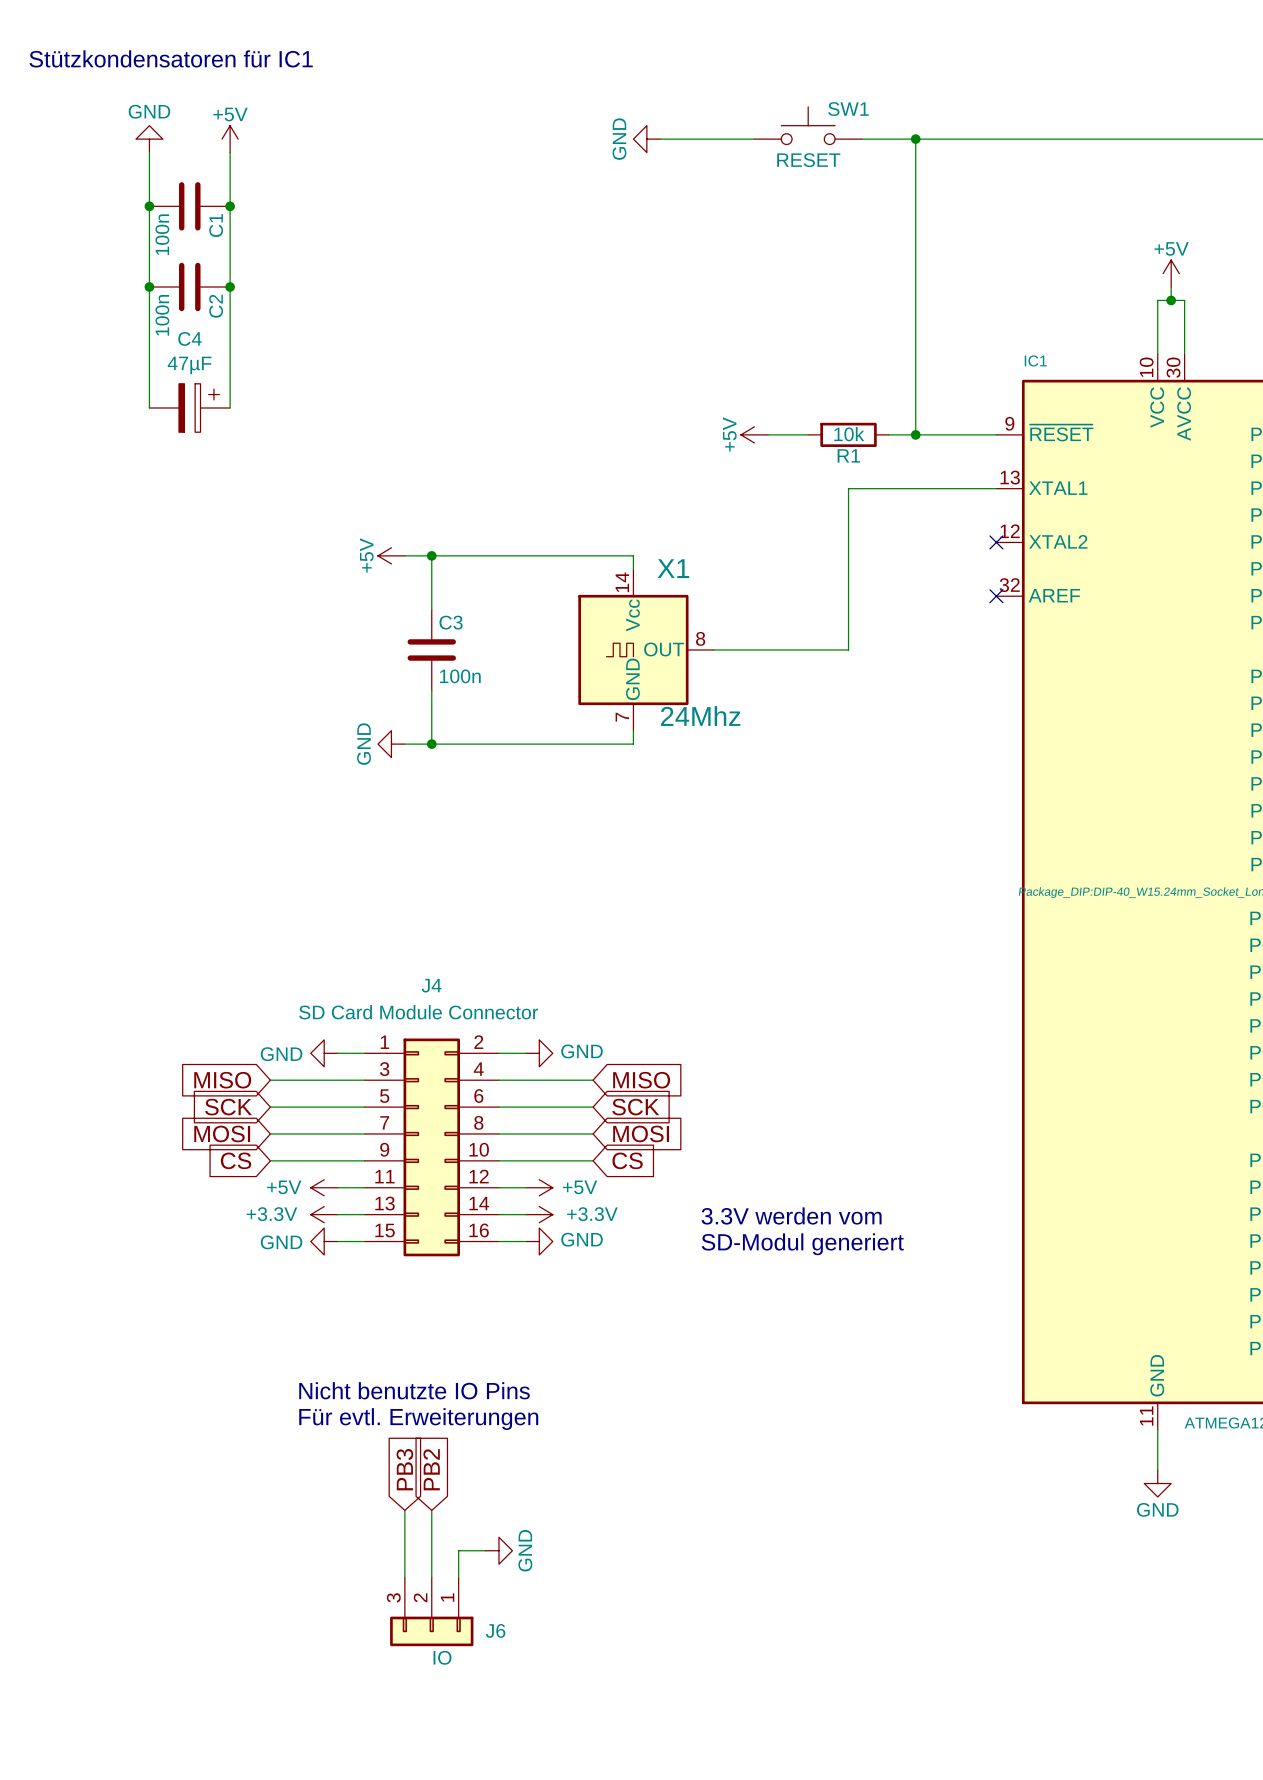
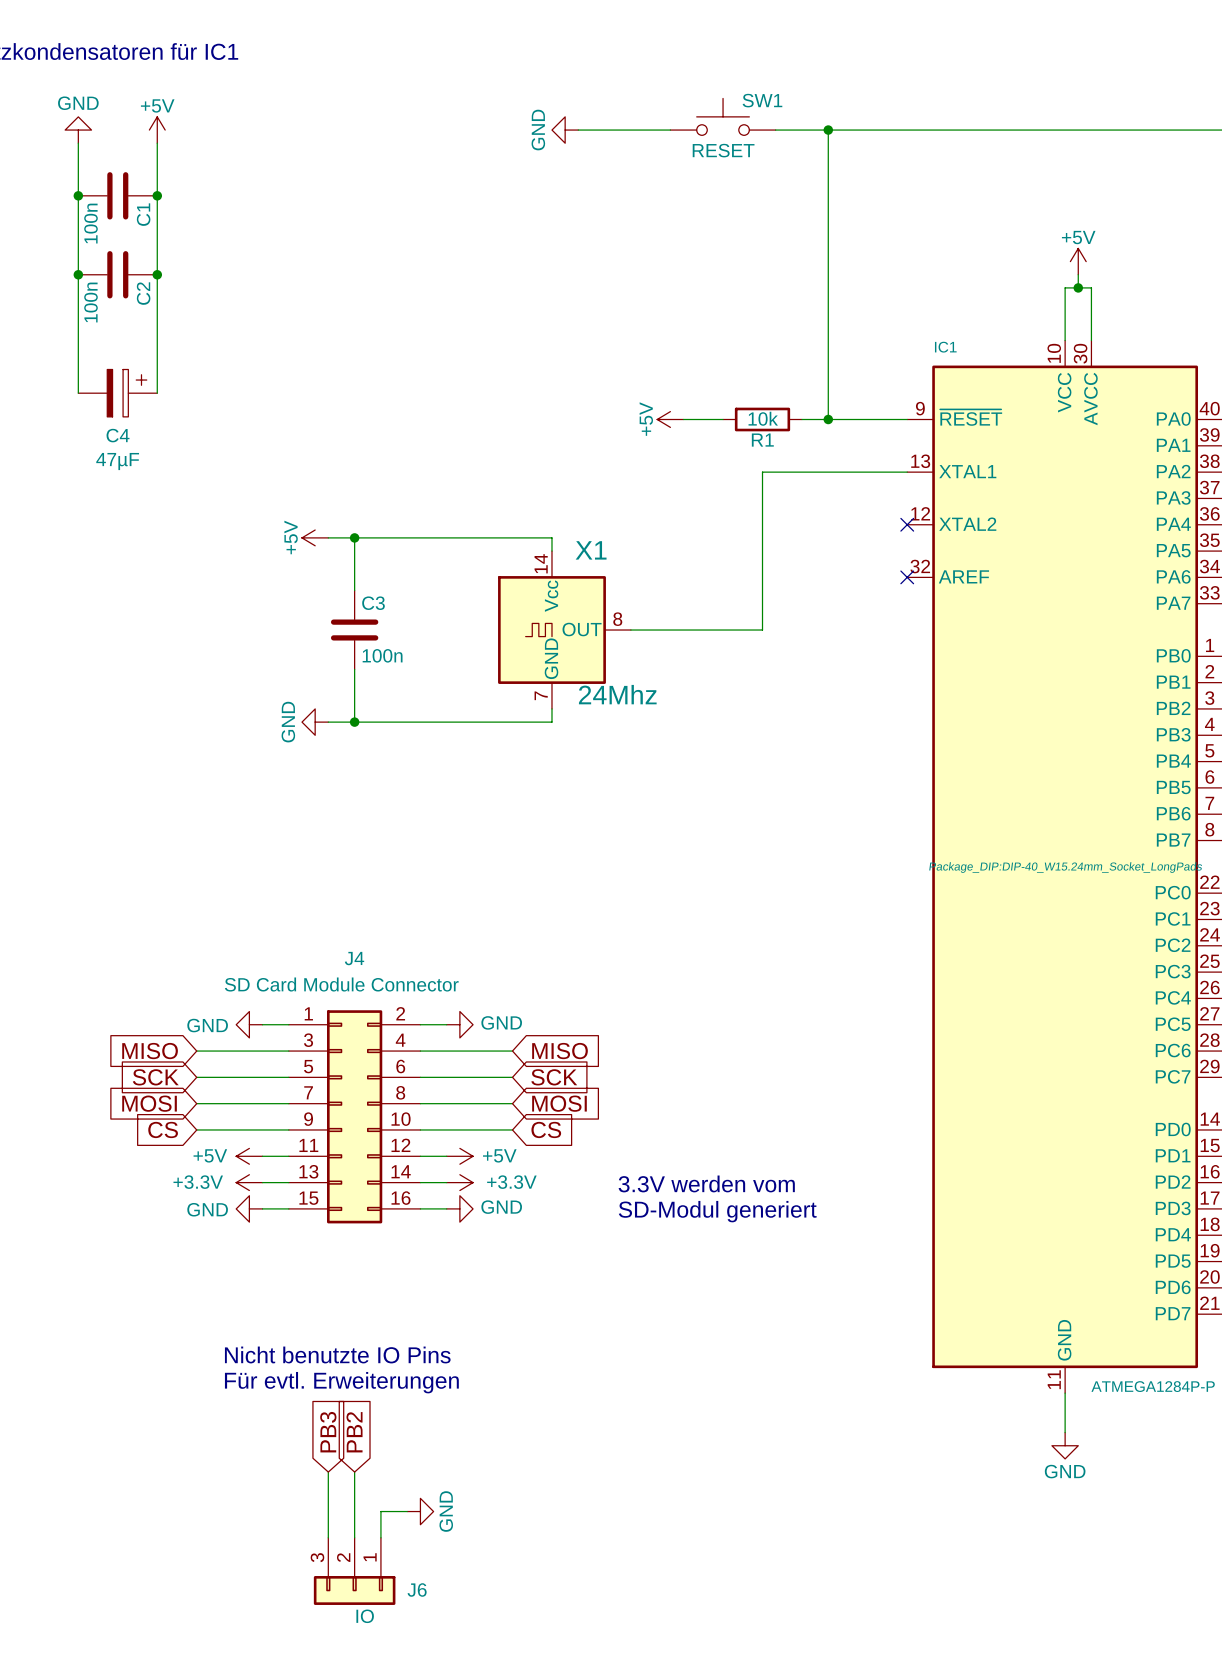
C4 name position: C4 (189, 338) -> C4 (118, 435)
C4 value position: 47µF (189, 365) -> 47µF (117, 461)

